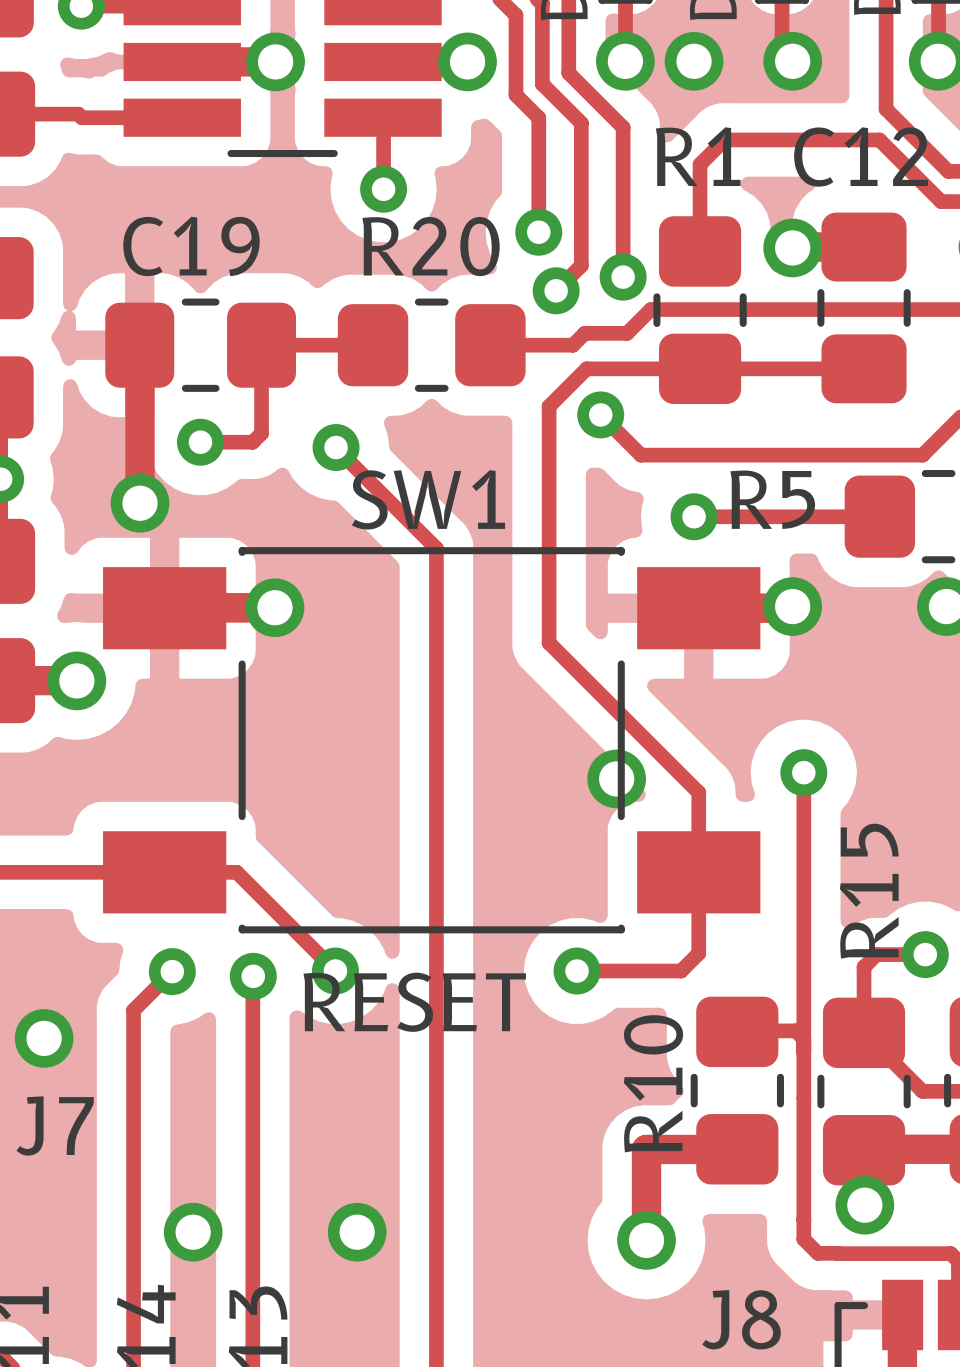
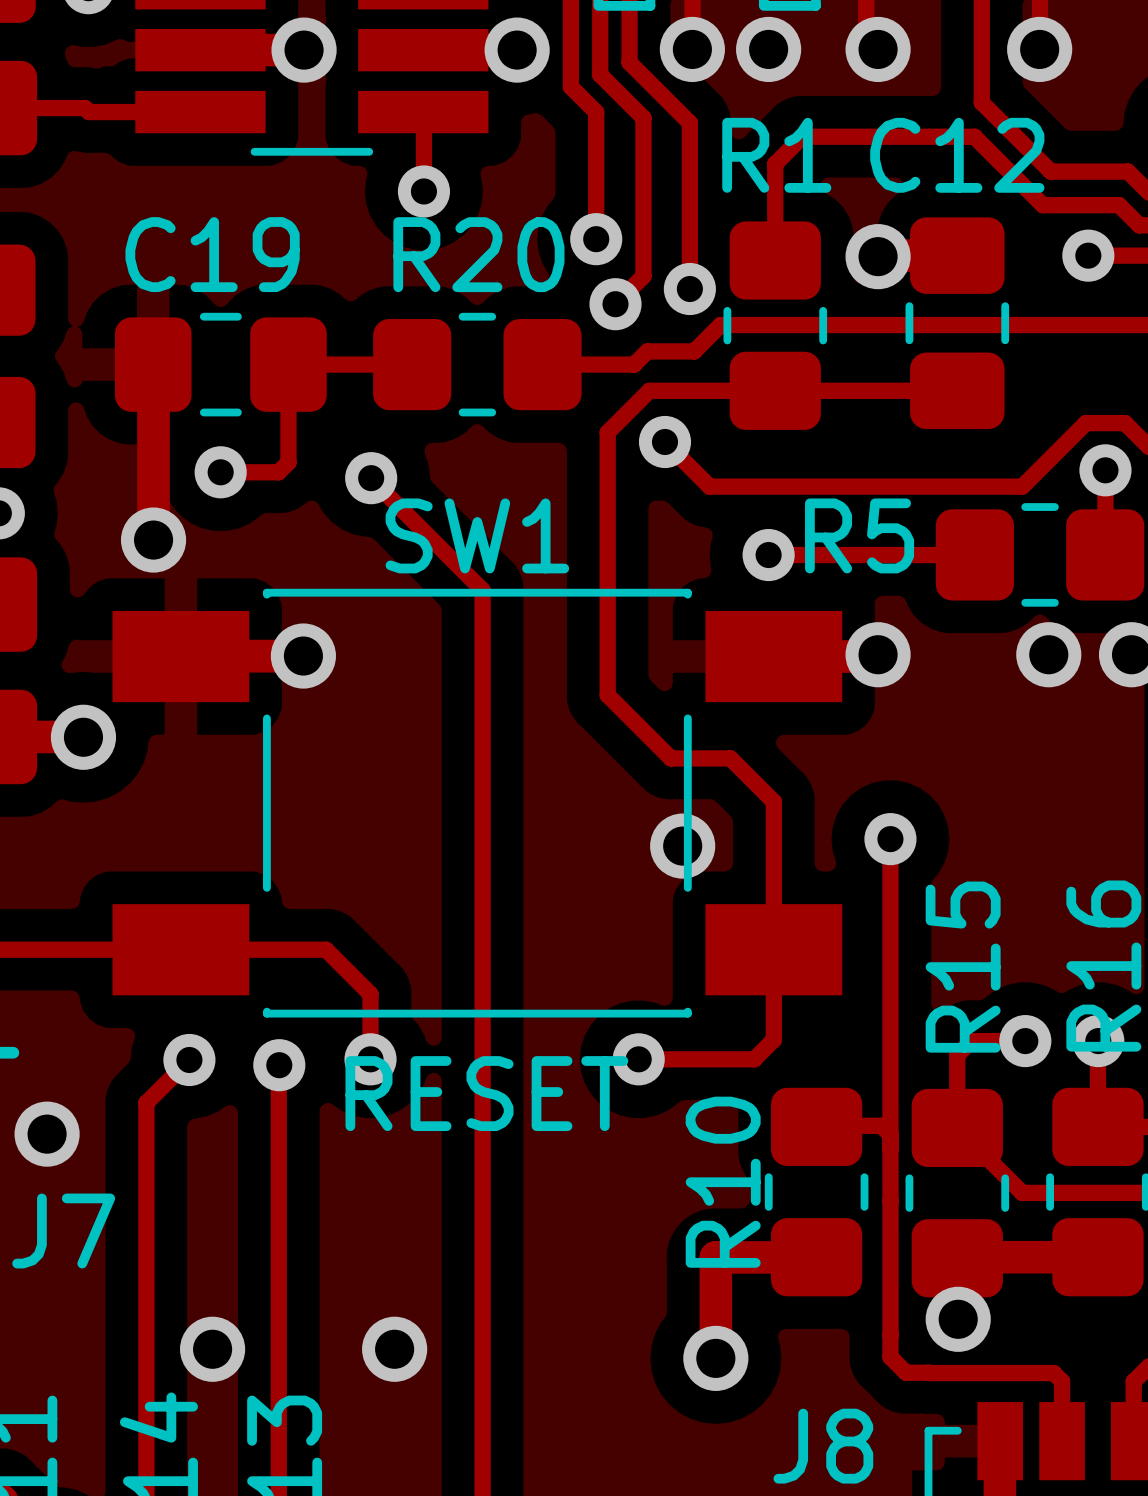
track: (606, 700) (698, 792) -> (671, 758) (730, 758) (773, 801) (773, 861)
track: (236, 872) (335, 971) -> (260, 949) (326, 949) (370, 994) (370, 1059)

